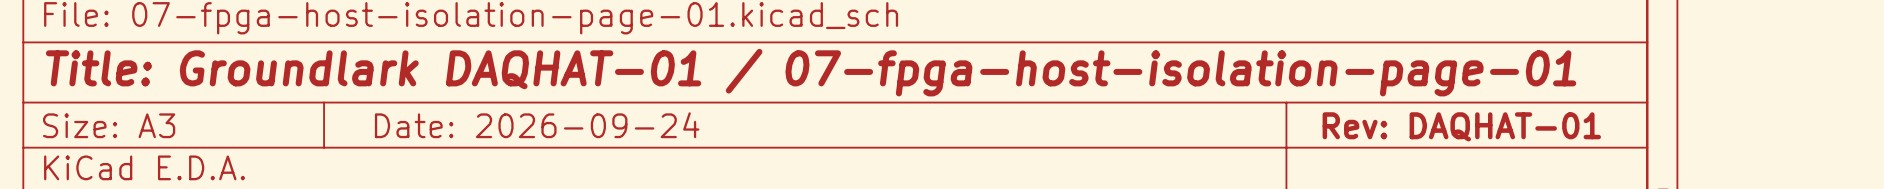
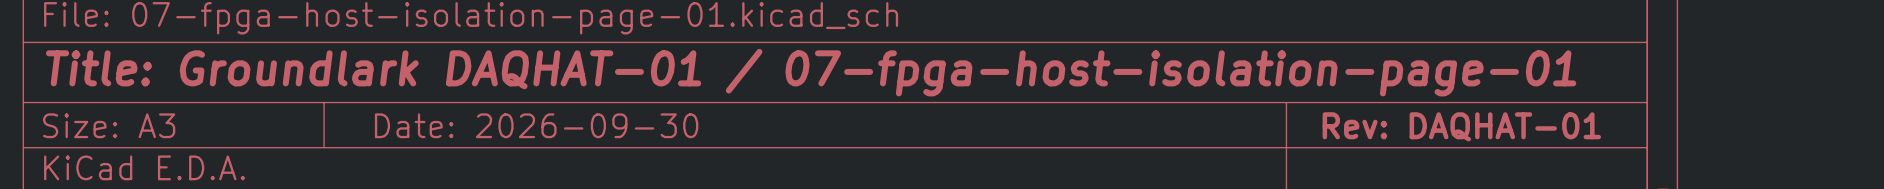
title block: Date: 2026-09-24 (537, 125) -> Date: 2026-09-30 (536, 125)

